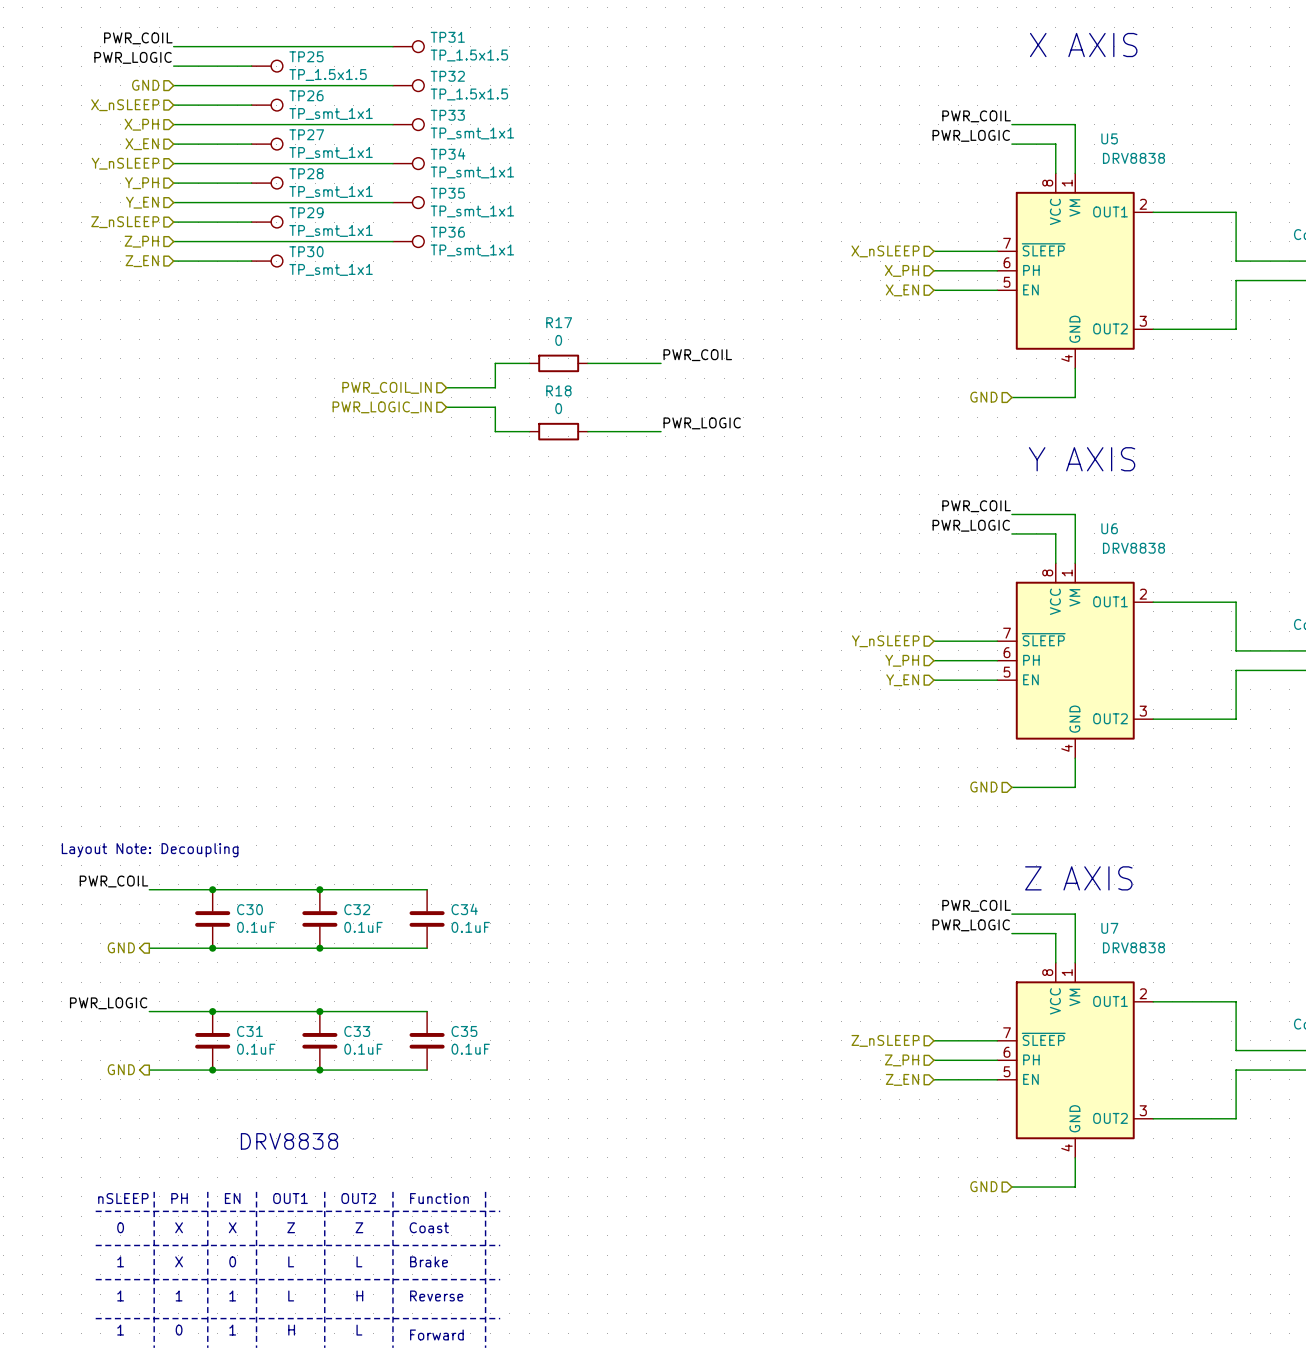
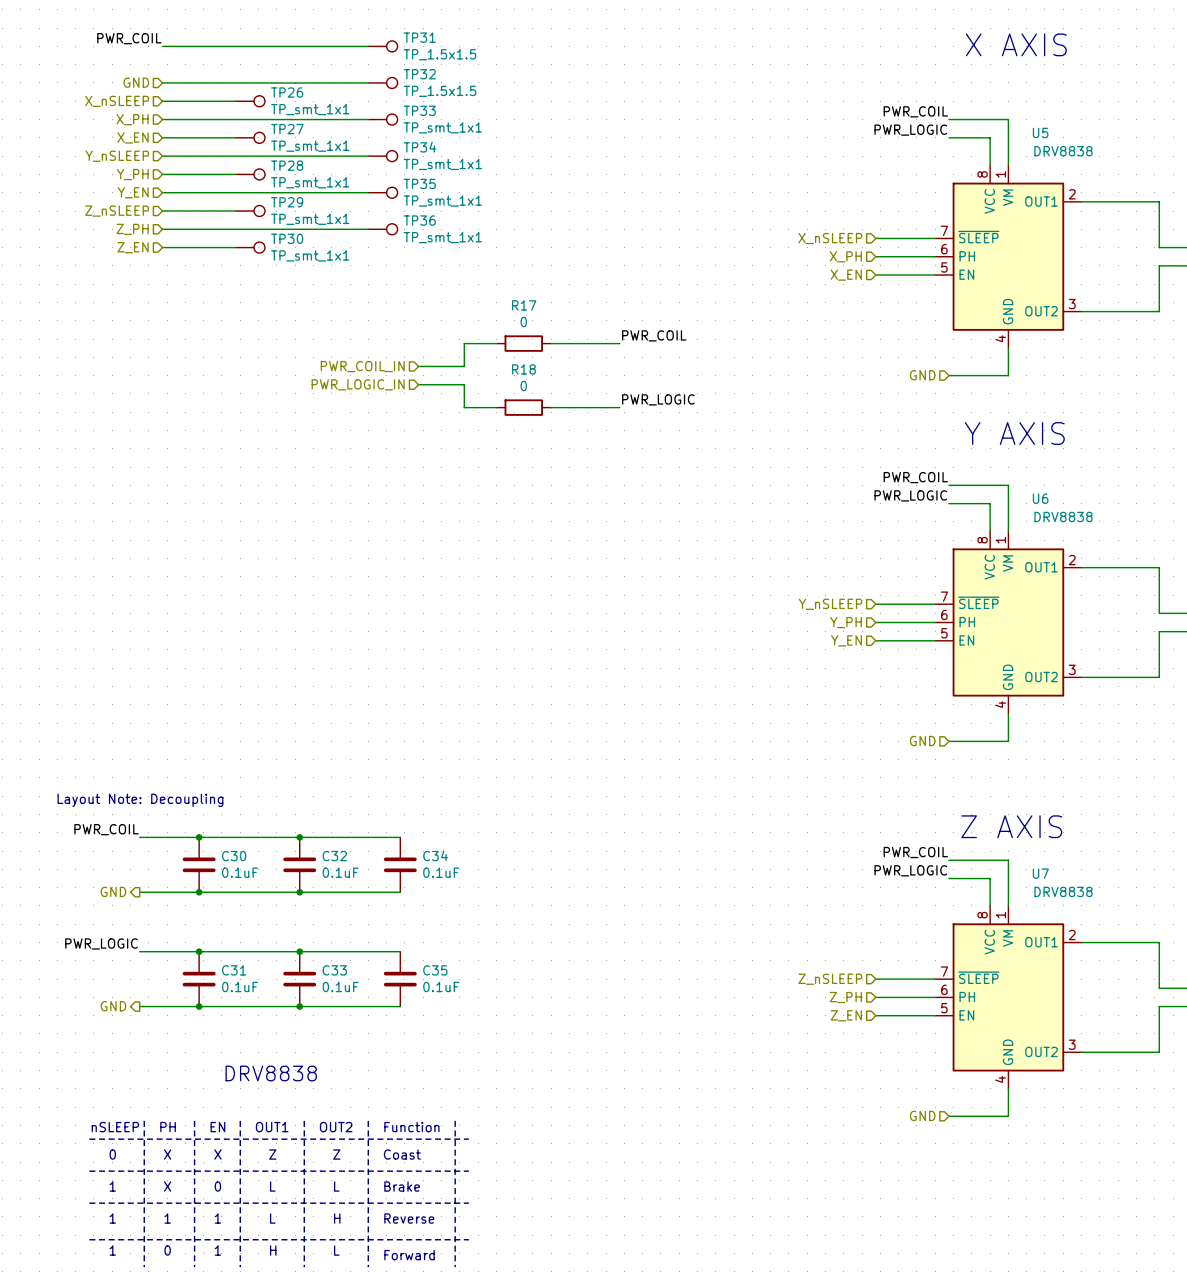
label: PWR_LOGIC (132, 57) -> none
wire: (173, 66) (251, 66) -> none
TP25: TP_1.5x1.5 (267, 66) -> none

